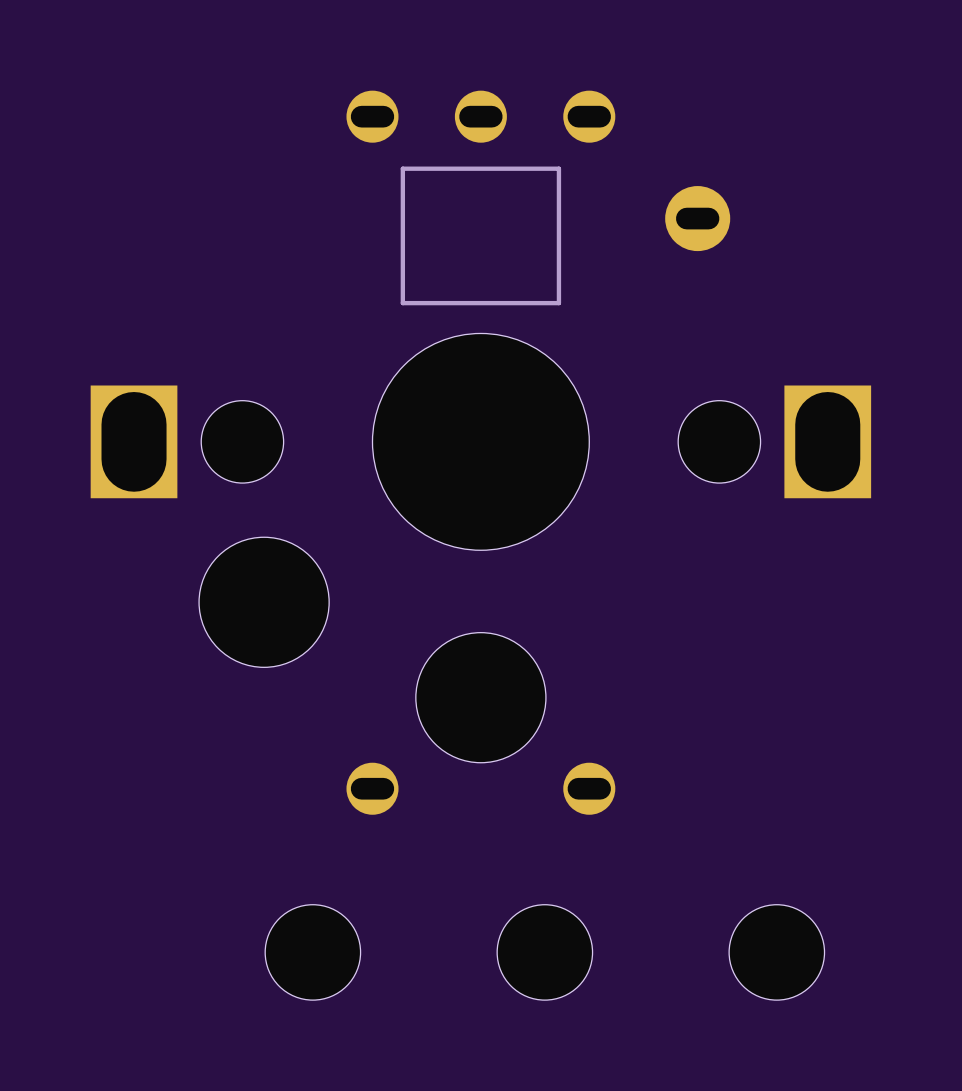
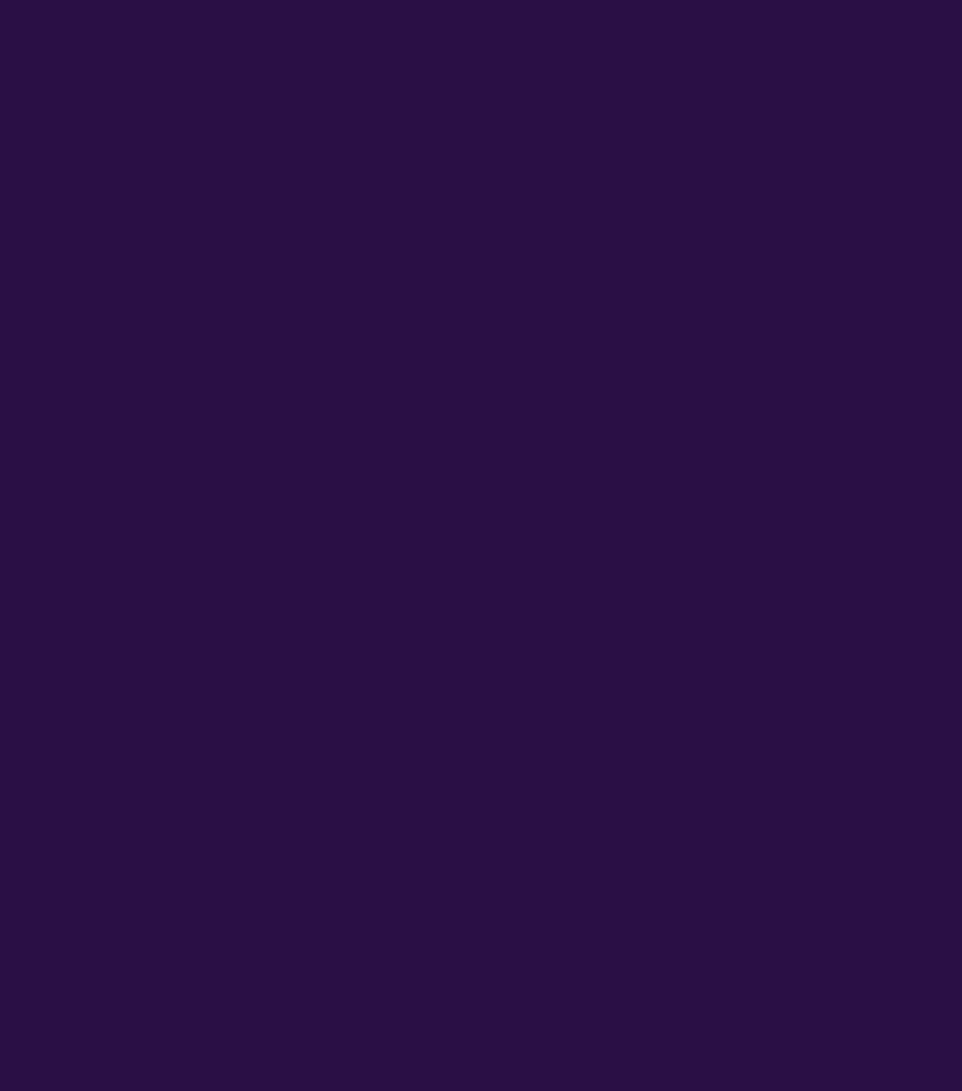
part: (480, 452) -> none
part: (312, 952) -> none
part: (544, 952) -> none
part: (776, 952) -> none

